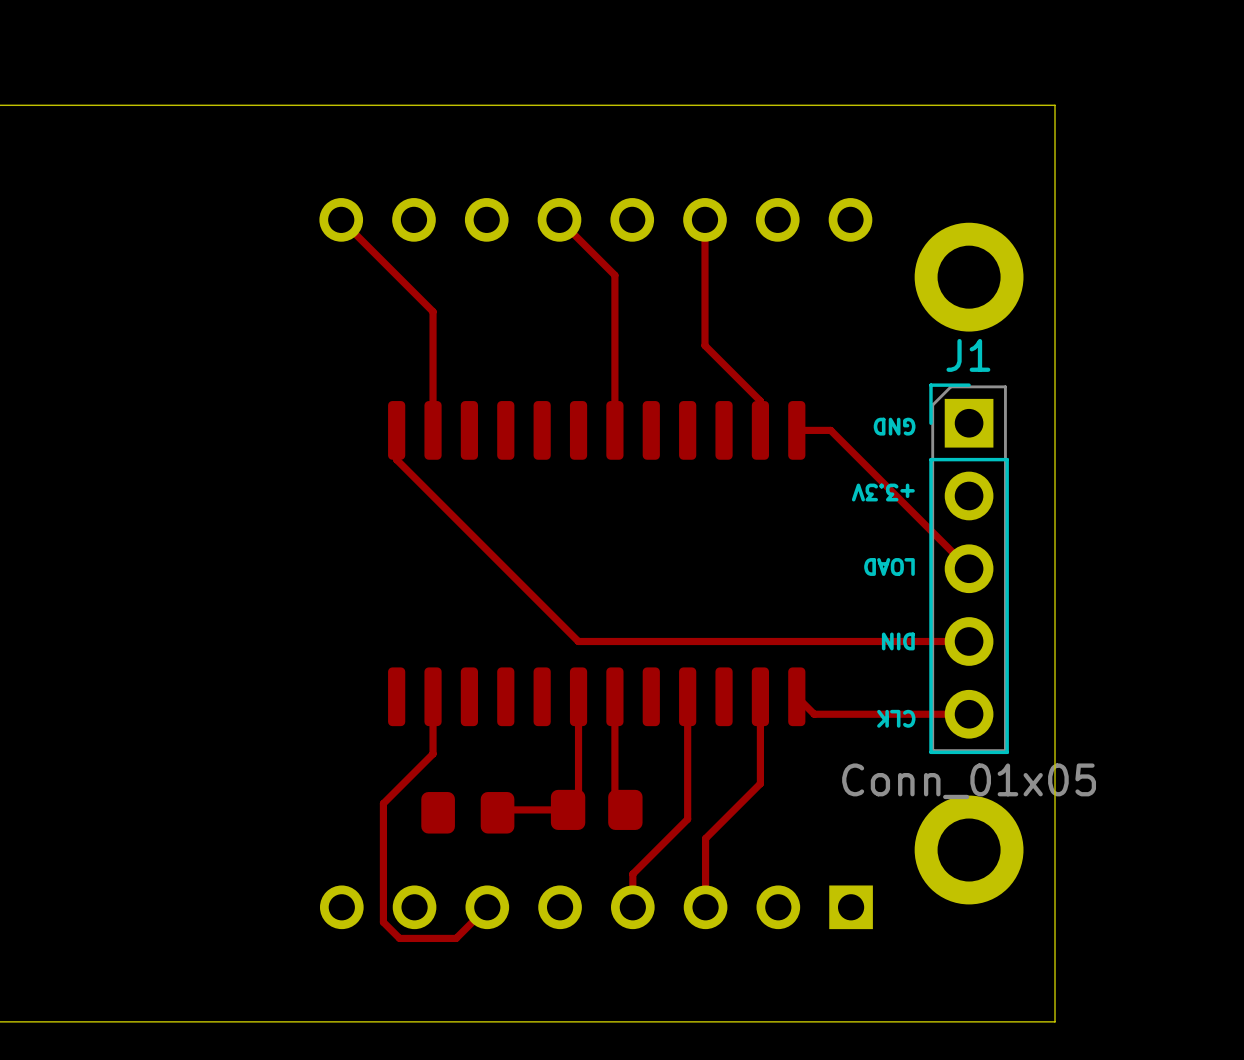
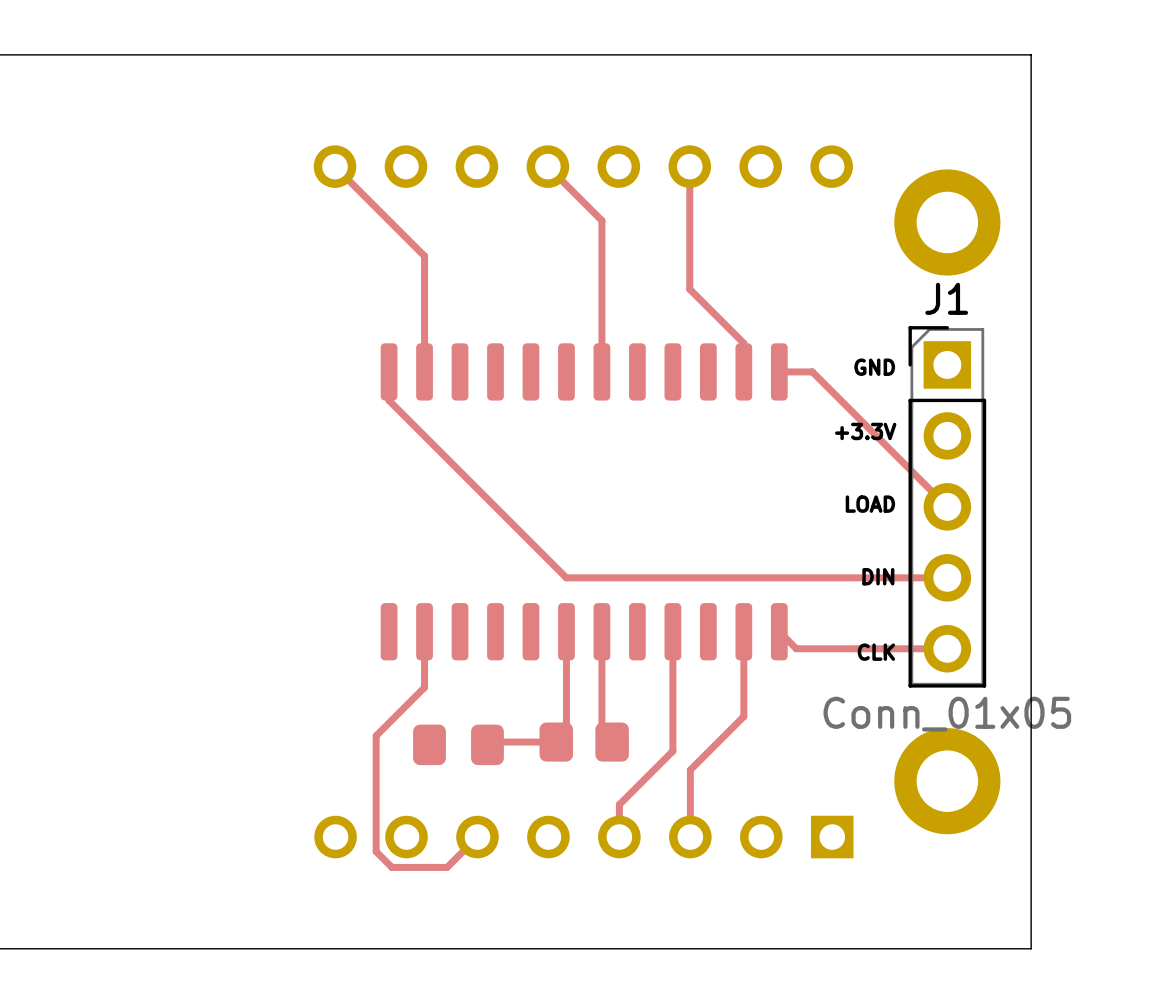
text rotation: 0° (894, 426) -> 180° (874, 367)
text rotation: 0° (883, 492) -> 180° (865, 431)
text rotation: 0° (889, 566) -> 180° (870, 504)
text rotation: 0° (898, 641) -> 180° (878, 576)
text rotation: 0° (896, 718) -> 180° (876, 652)

